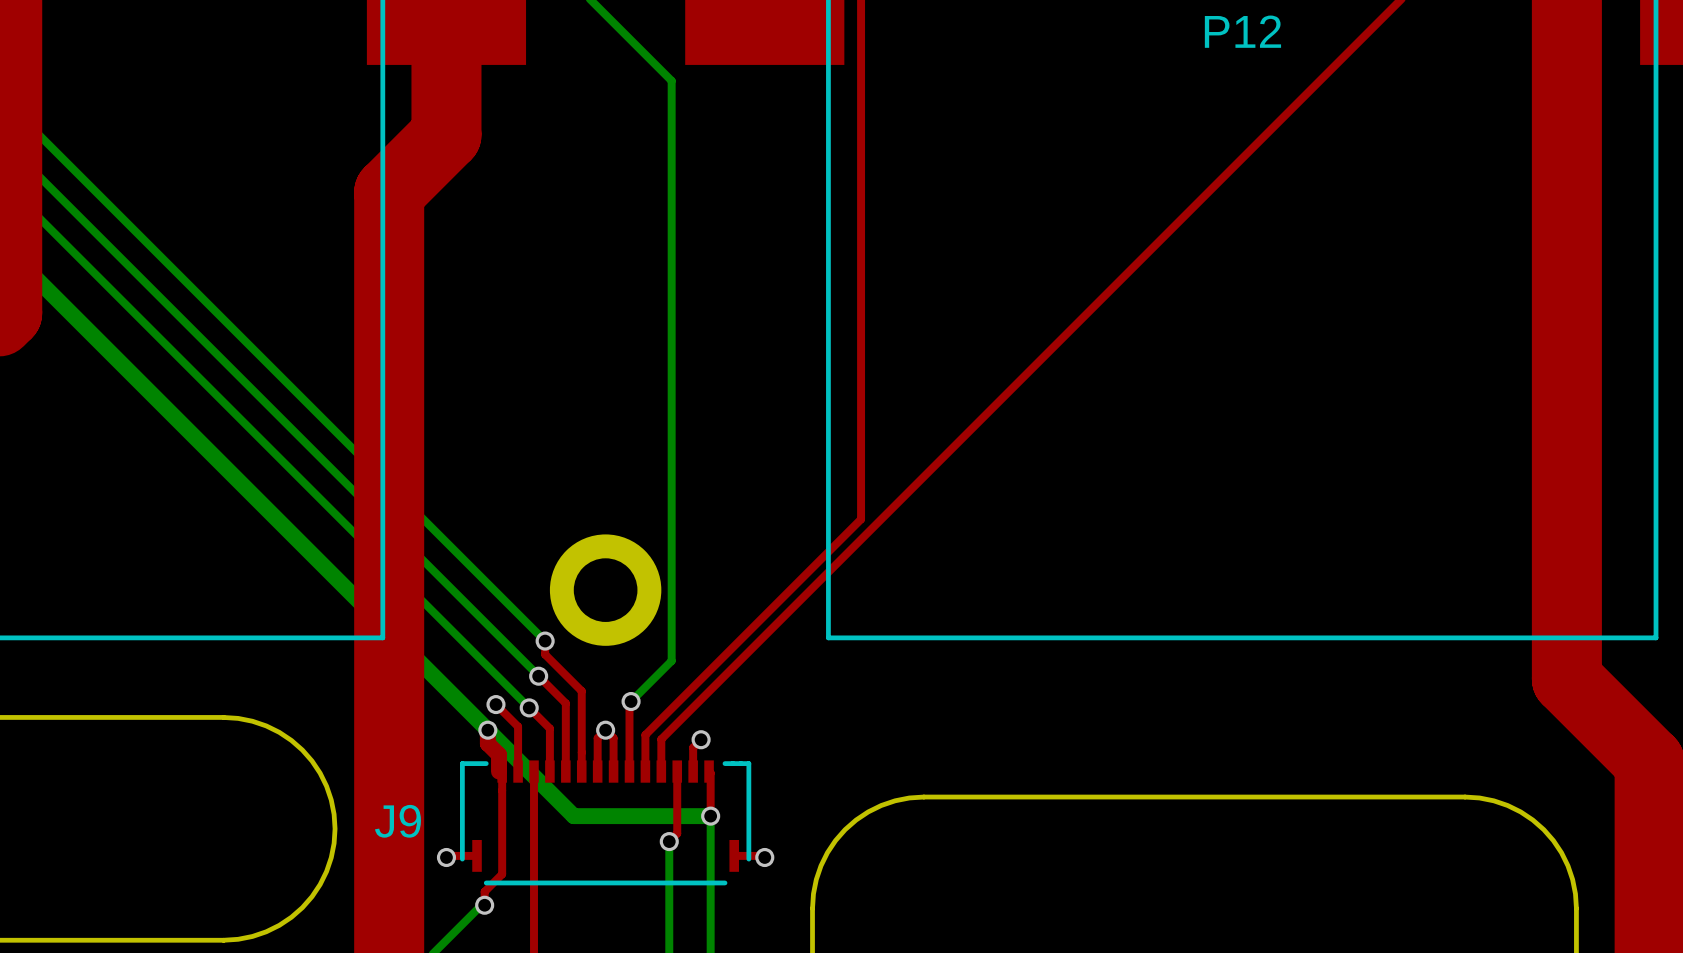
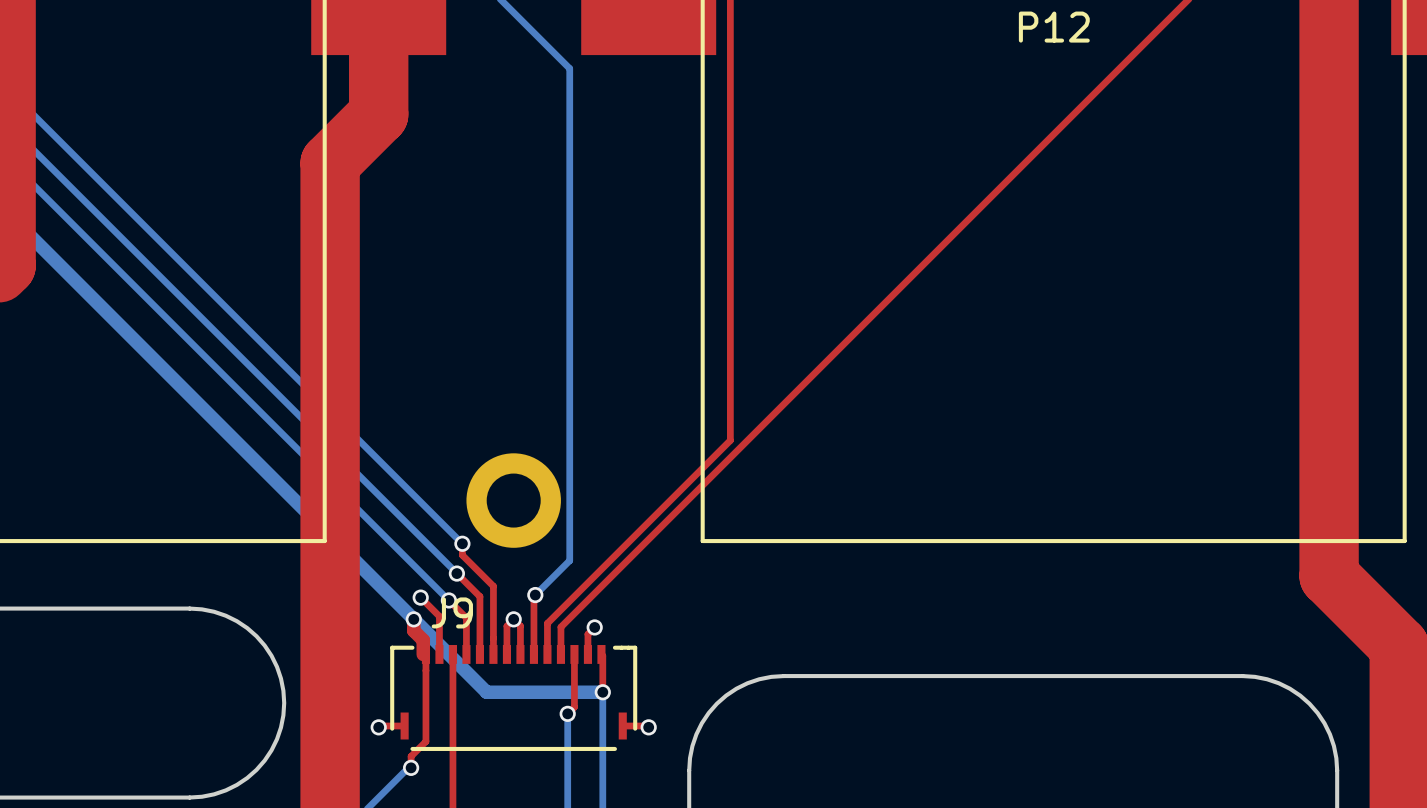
J9 name position: J9 (397, 821) -> J9 (452, 612)

